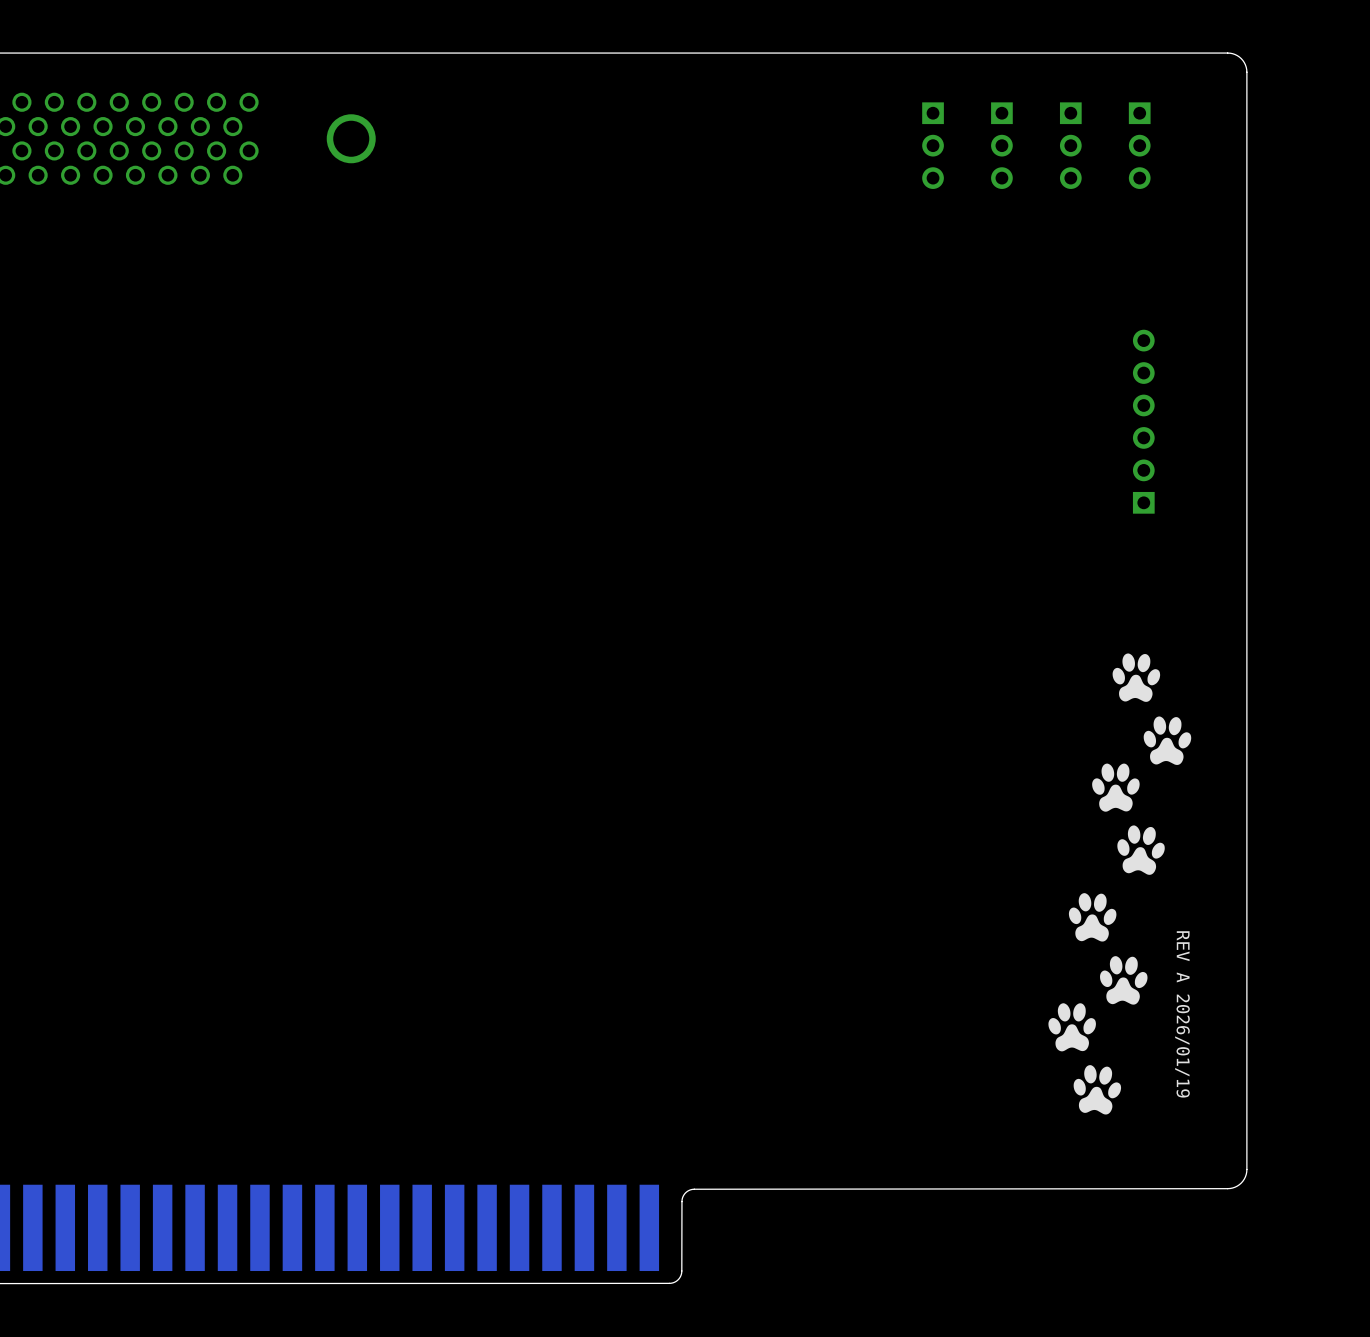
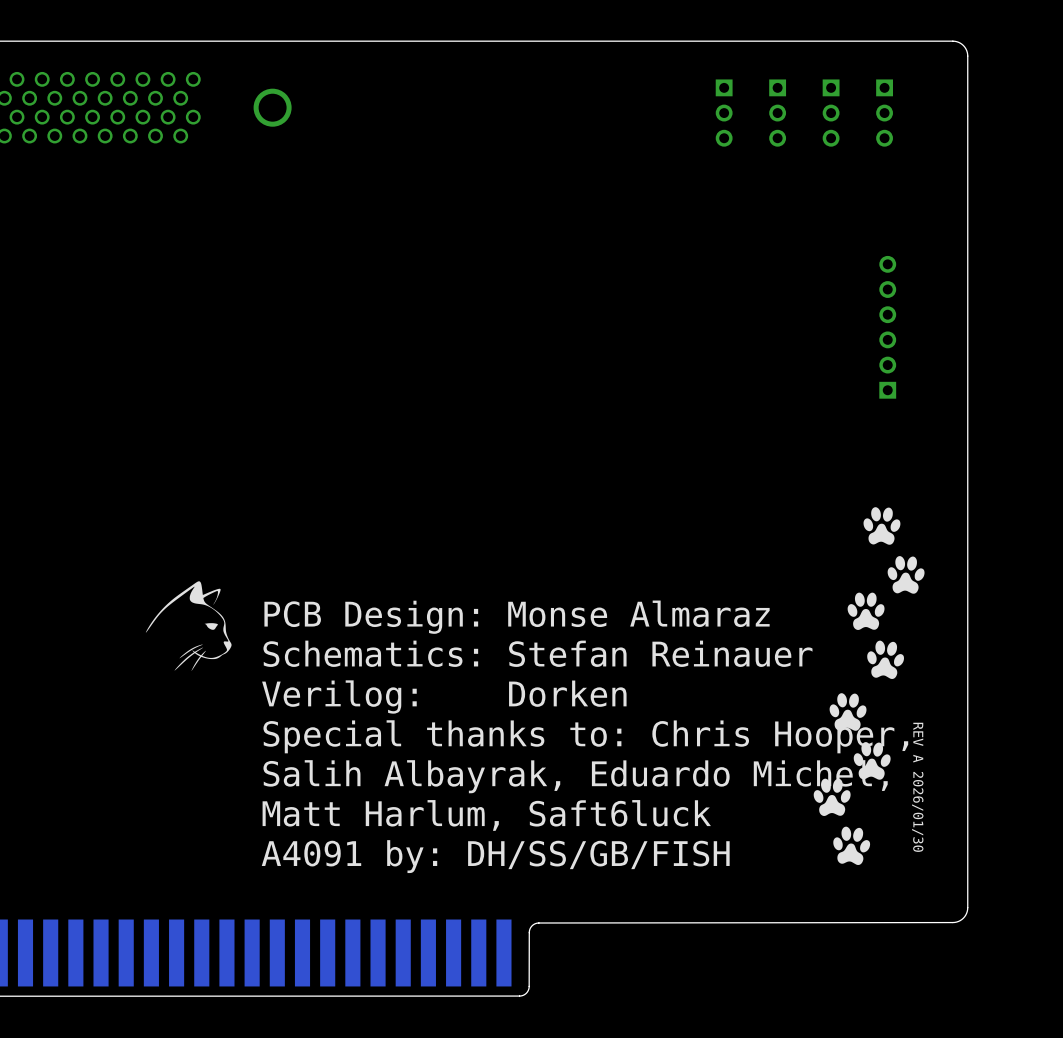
drawing: none -> [145, 581, 232, 671]
text: none -> PCB Design: Monse Almaraz (517, 617)
text: none -> Schematics: Stefan Reinauer (537, 653)
text: none -> Verilog: Dorken (444, 697)
text: none -> Special thanks to: Chris Hooper, (585, 736)
text: none -> Salih Albayrak, Eduardo Michel, (575, 776)
text: REV A 2026/01/19 (1182, 1014) -> REV A 2026/01/30 (917, 787)
text: none -> Matt Harlum, Saft6luck (486, 815)
text: none -> A4091 by: DH/SS/GB/FISH (495, 856)

